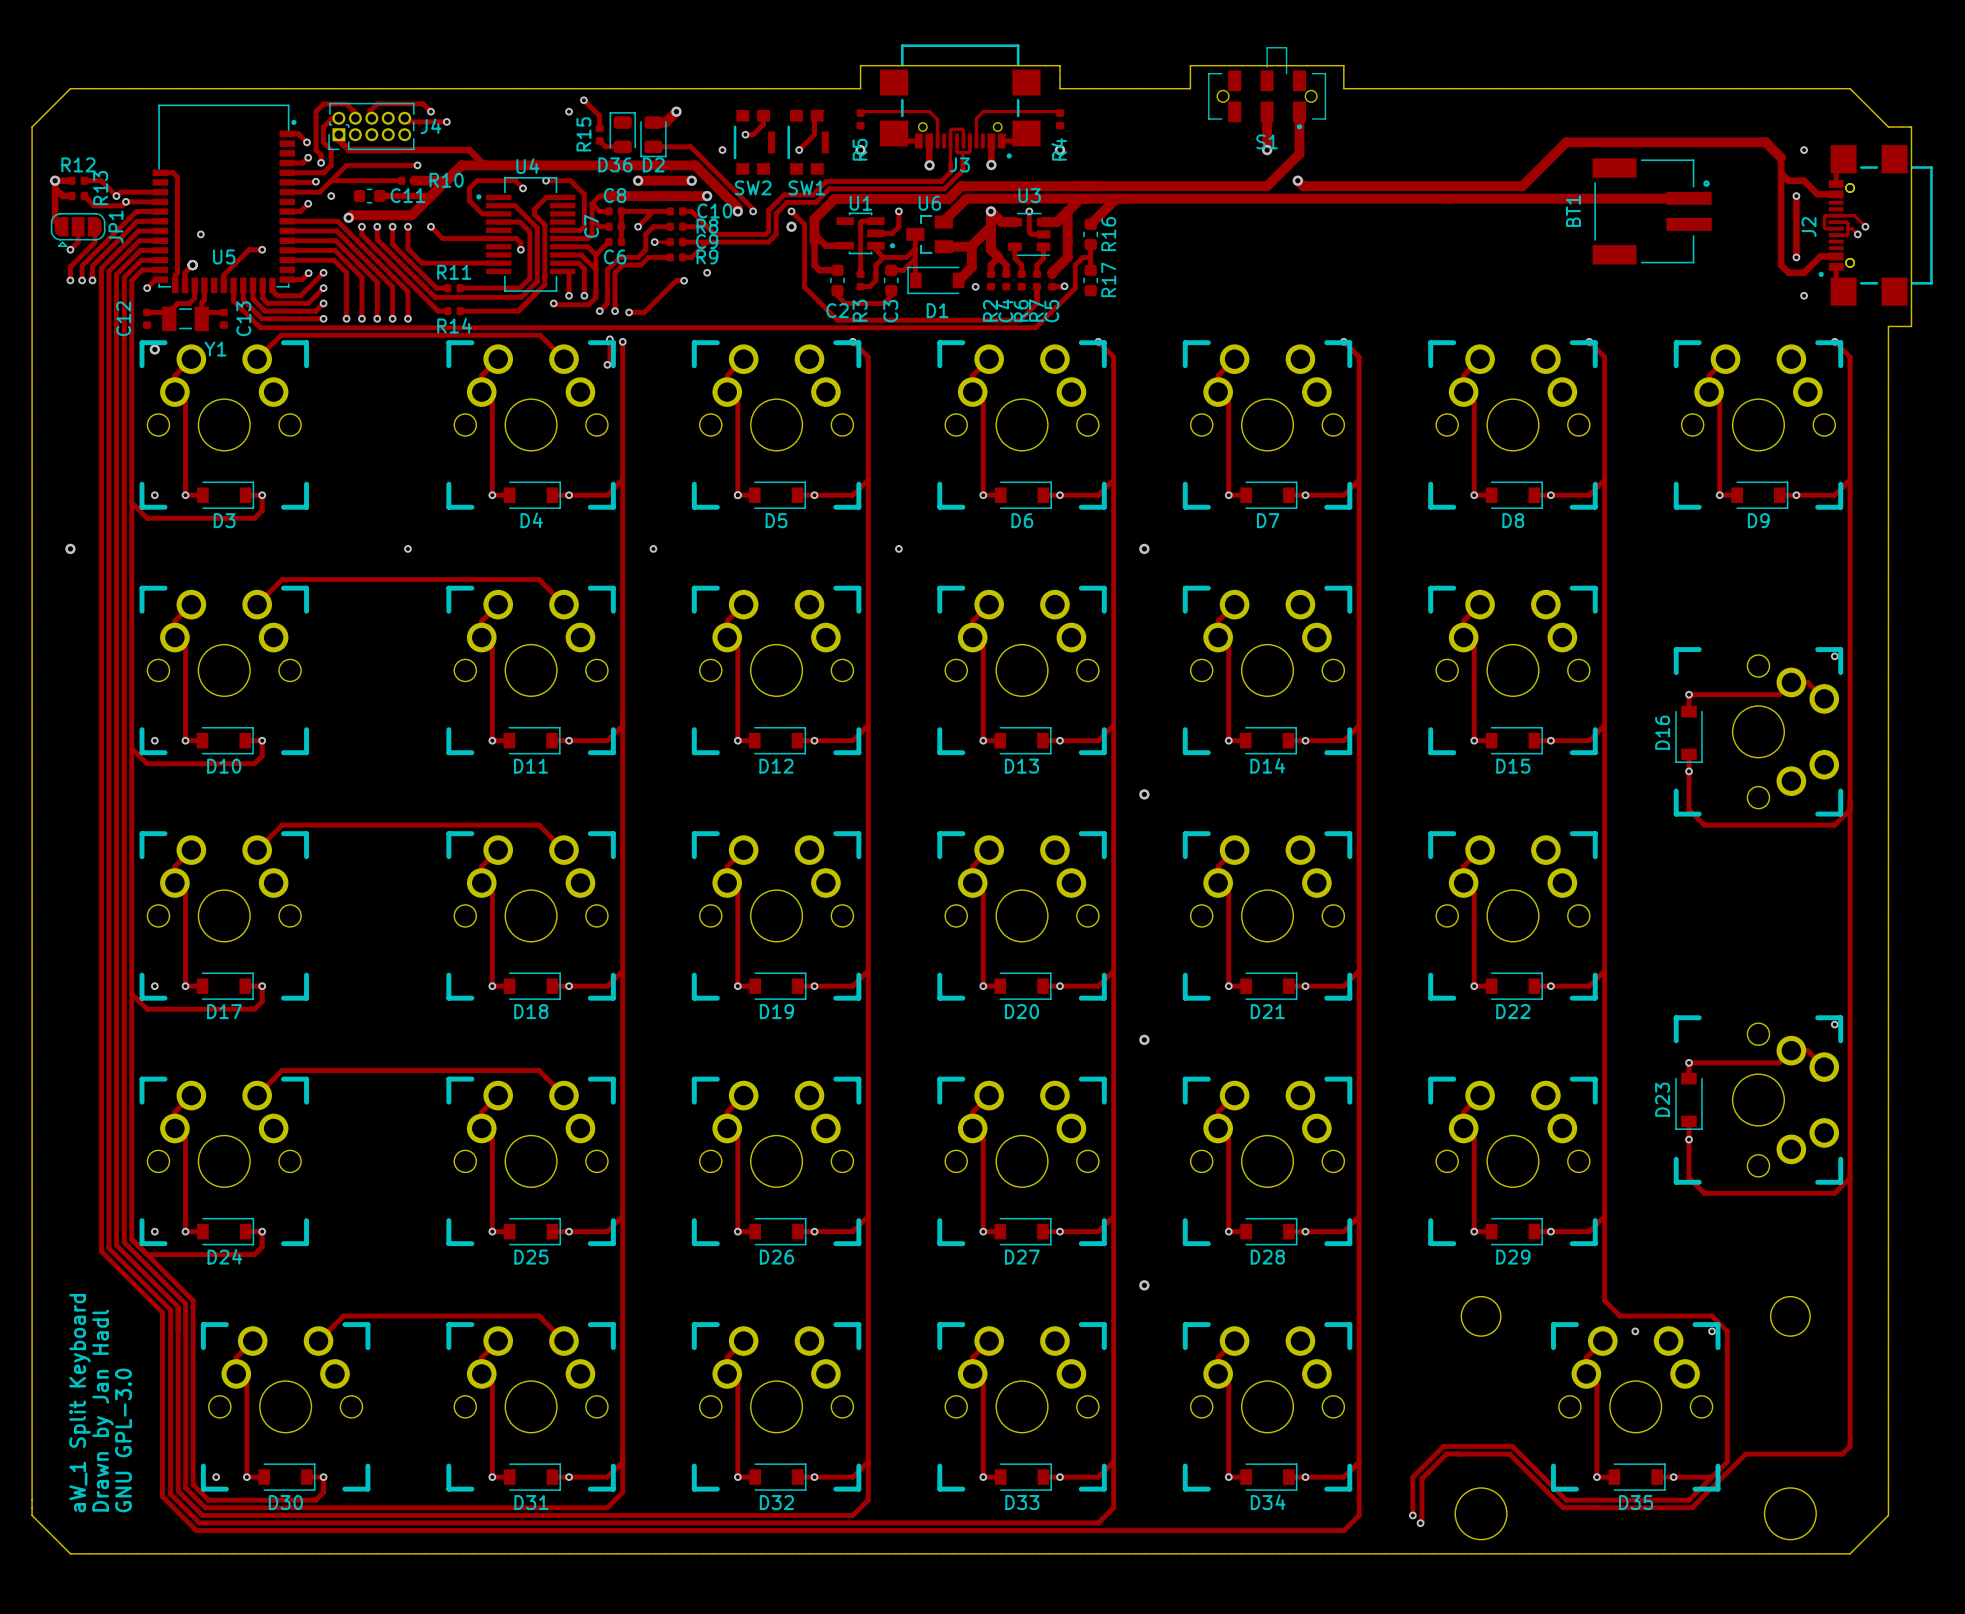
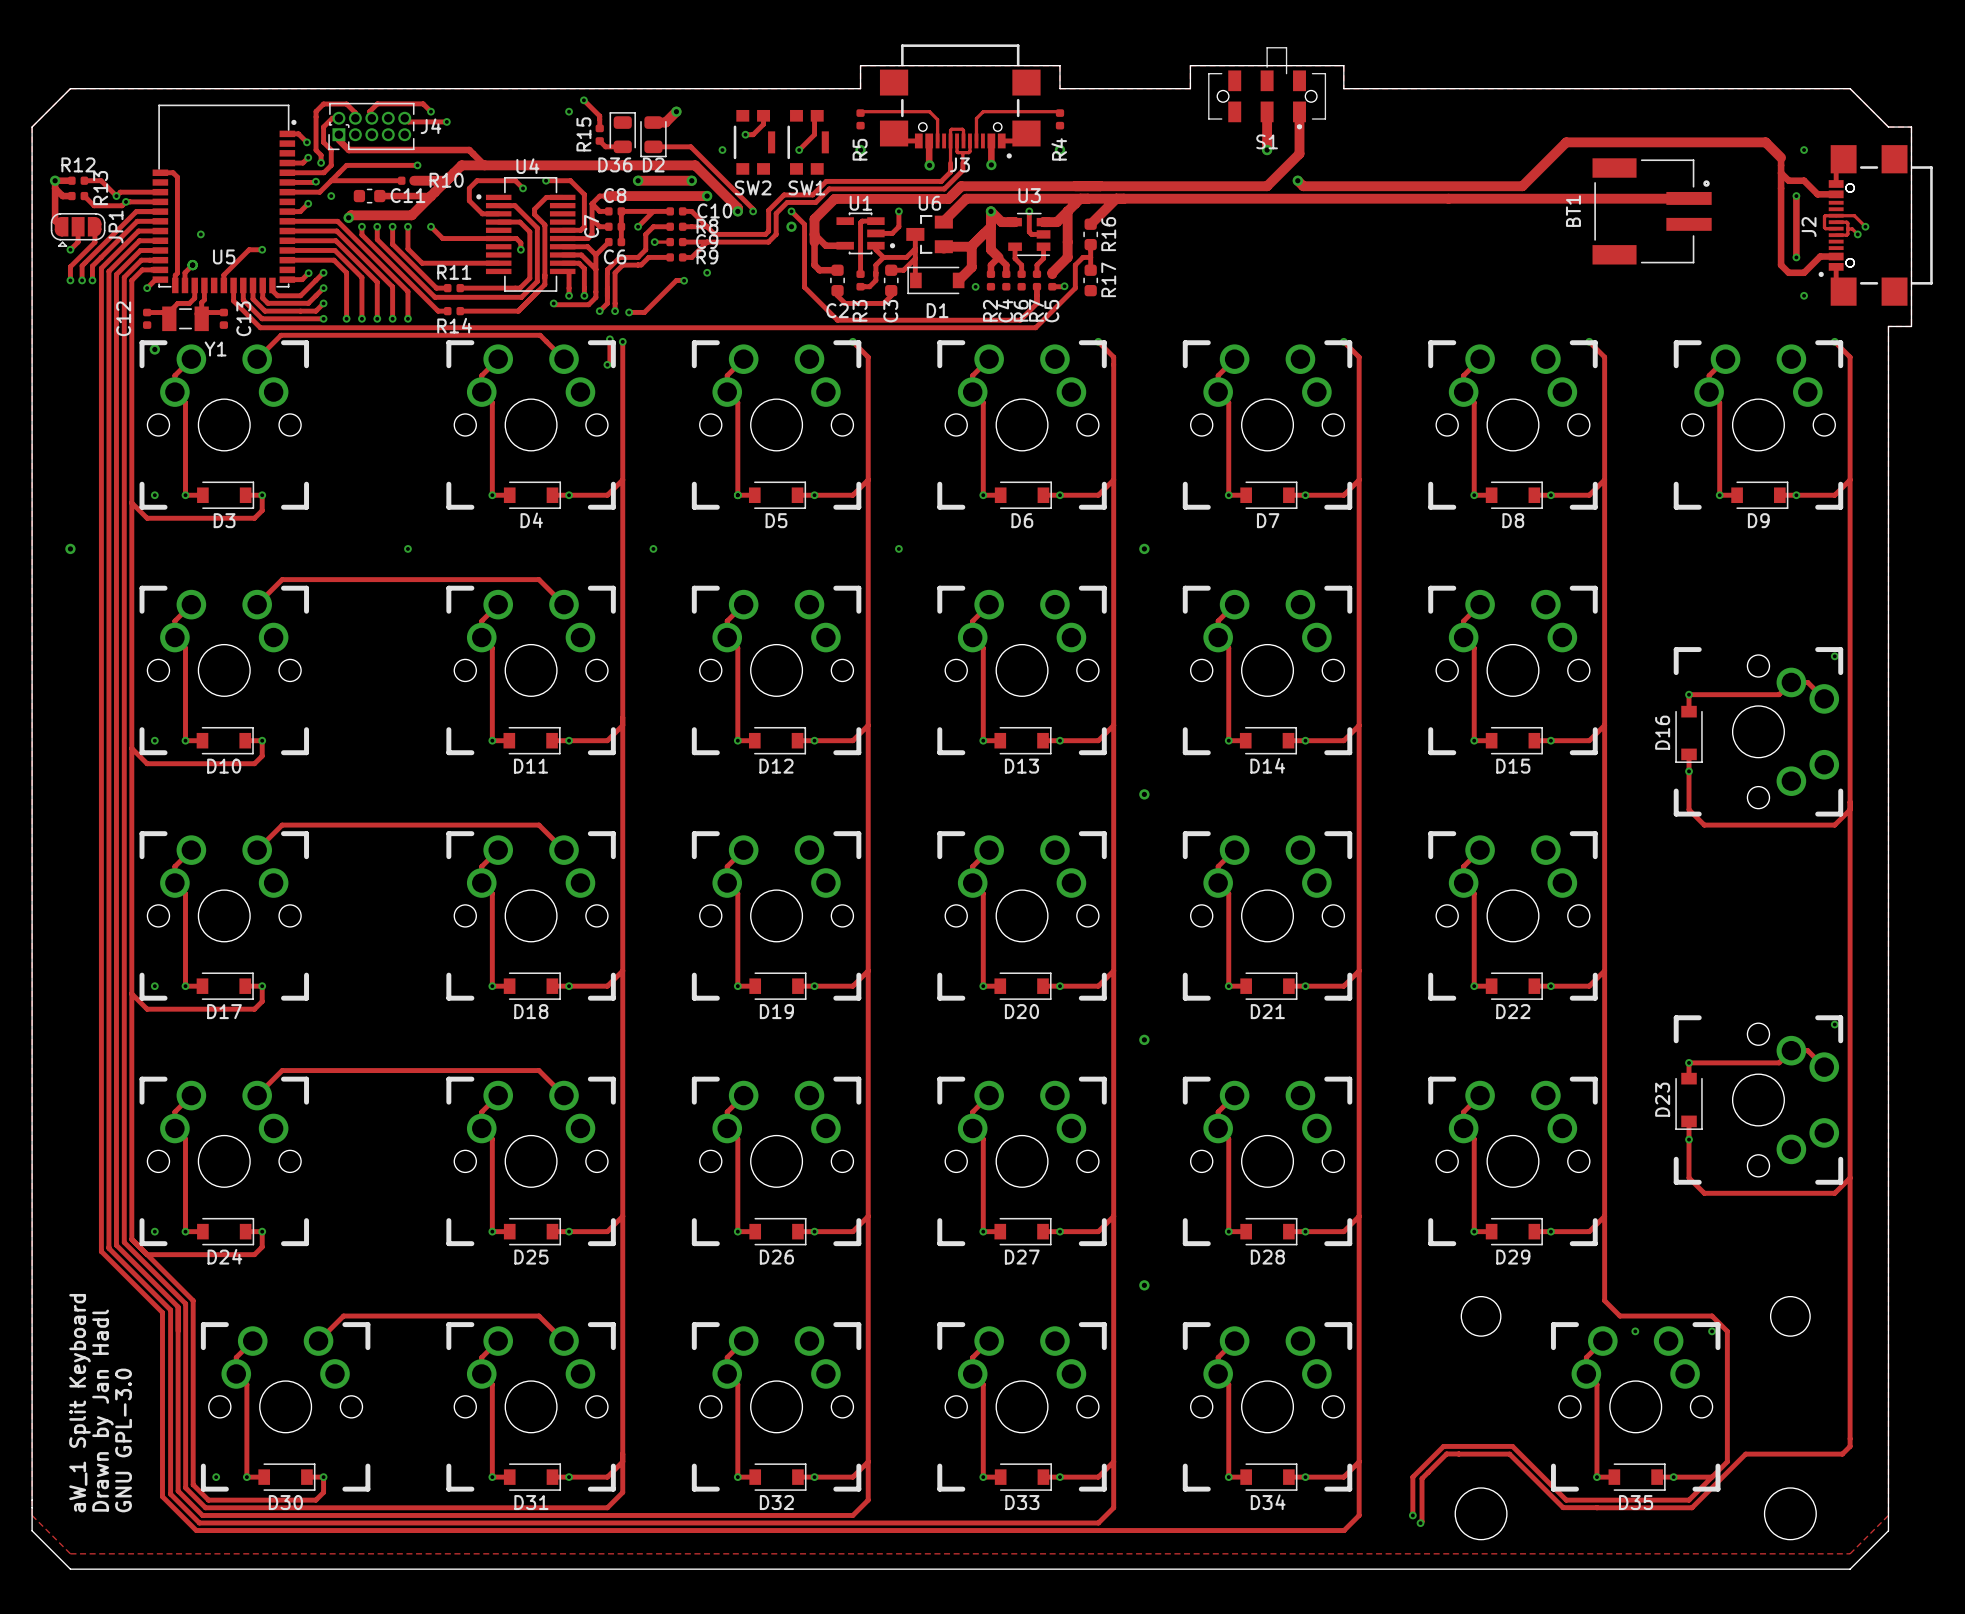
board edge: (32, 1515) (70, 1553) (1850, 1553) (1888, 1515) -> (32, 1515) (32, 1530) (70, 1569) (1850, 1569) (1888, 1530) (1888, 1515)

